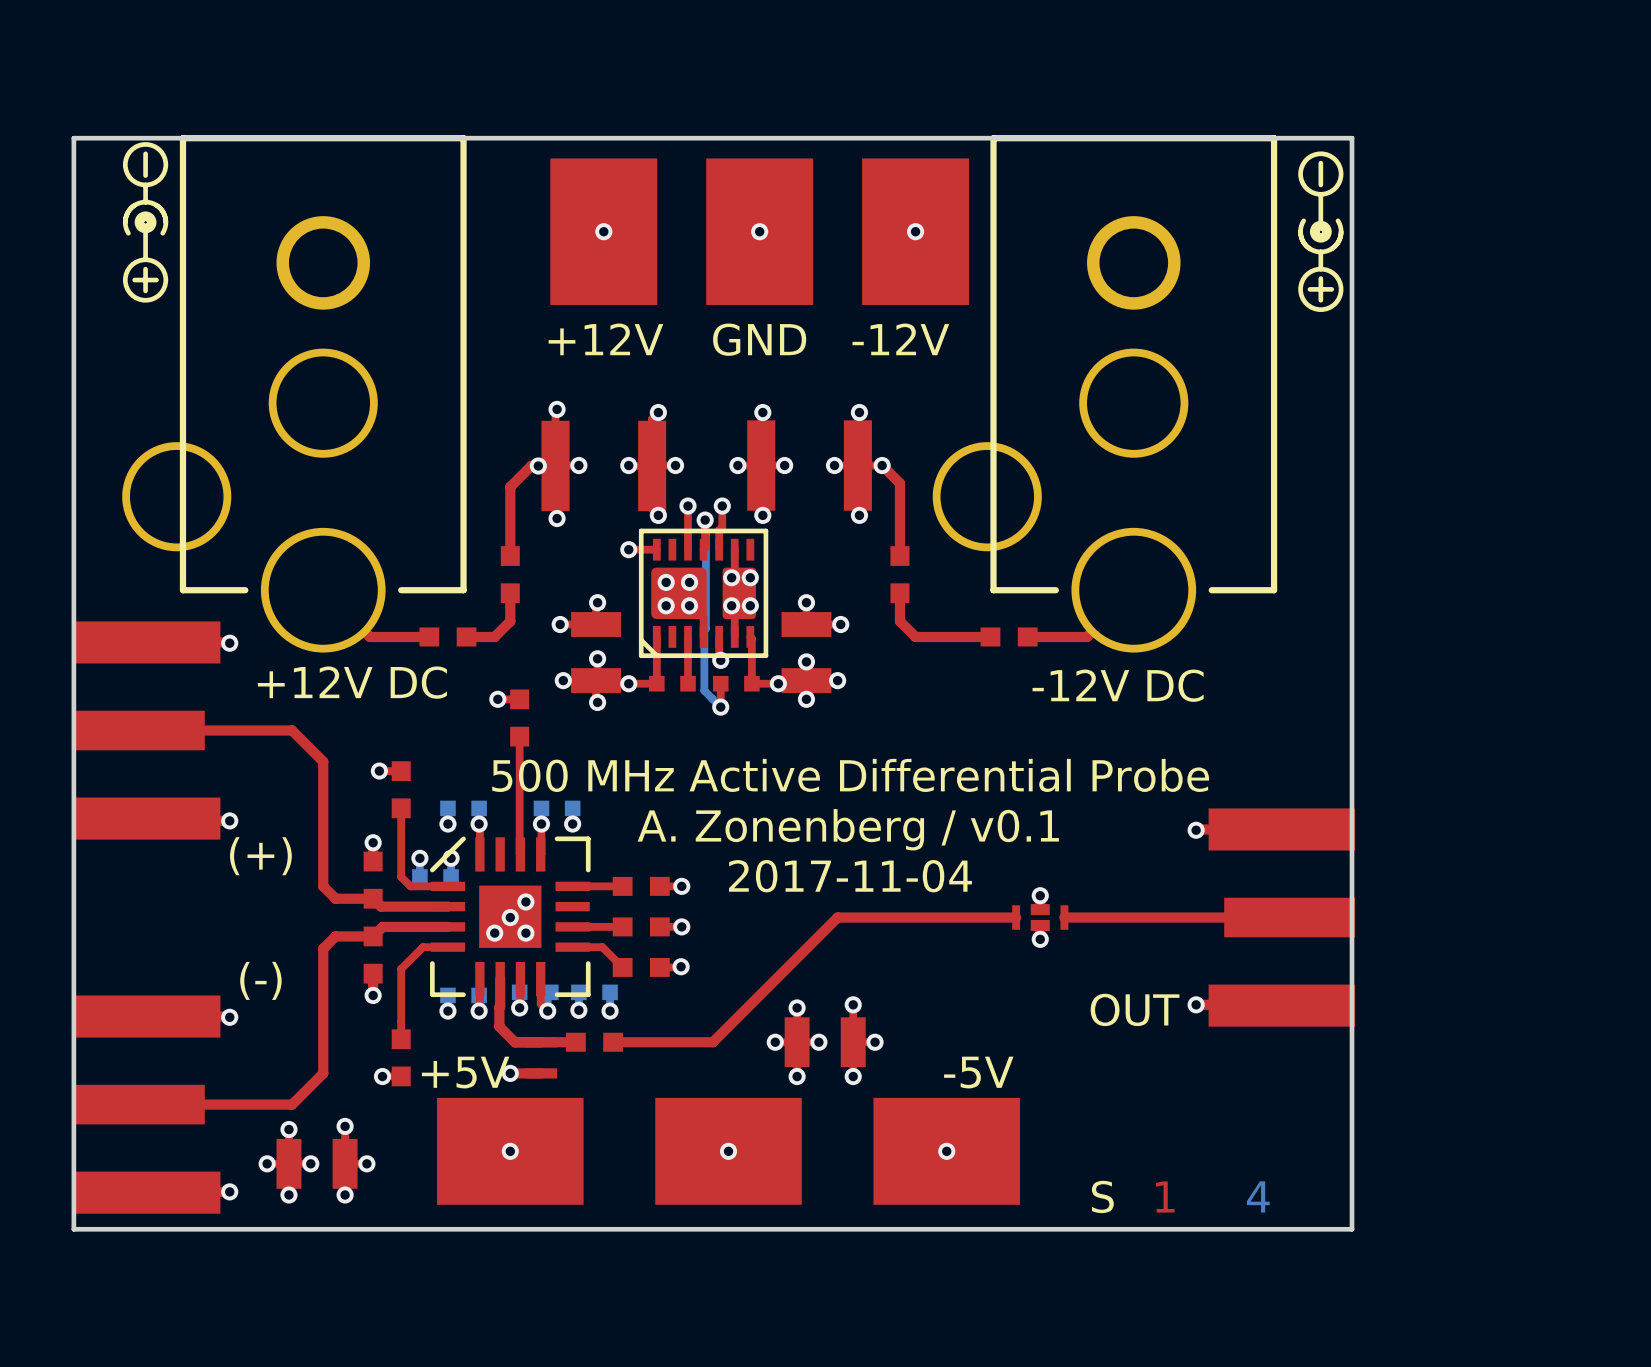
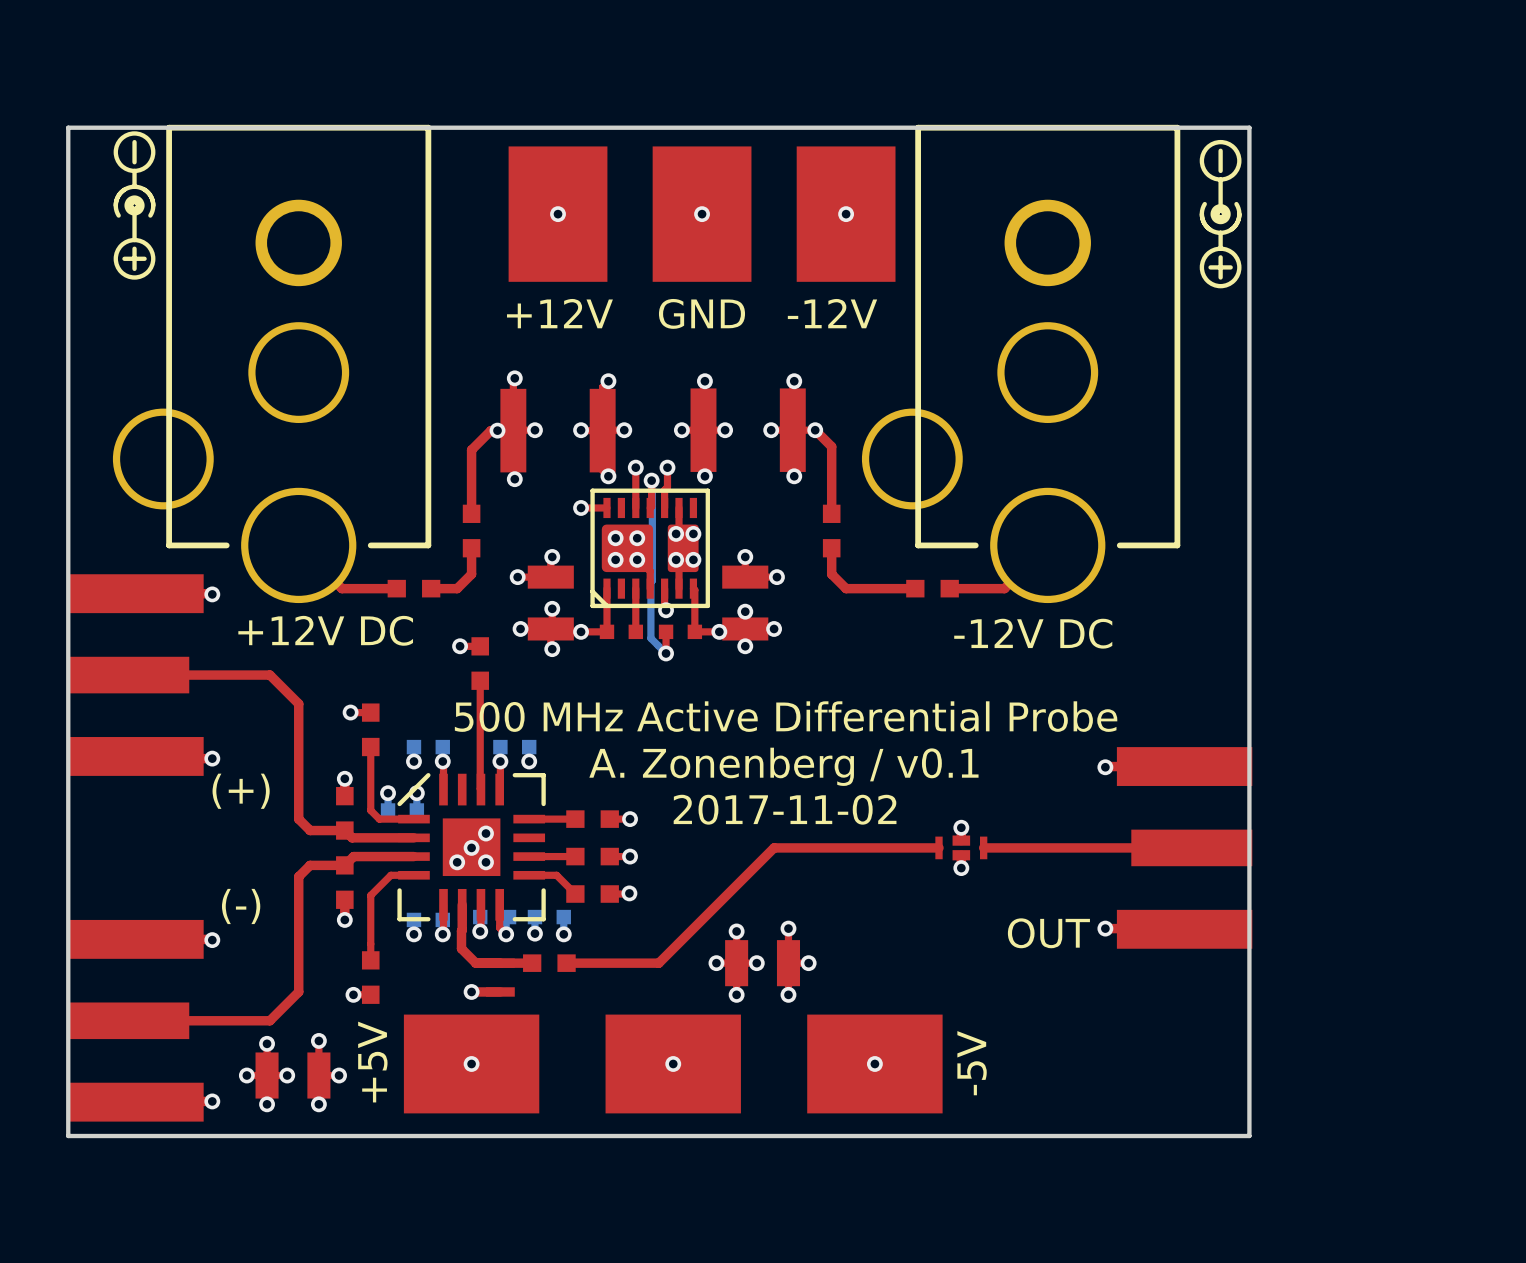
text: 2017-11-04 (850, 876) -> 2017-11-02 (785, 809)
text rotation: 0° (465, 1072) -> 90° counterclockwise (372, 1062)
text rotation: 0° (978, 1072) -> 90° counterclockwise (972, 1063)
text: S (1102, 1196) -> none
text: 1 (1165, 1196) -> none
text: 4 (1258, 1196) -> none

